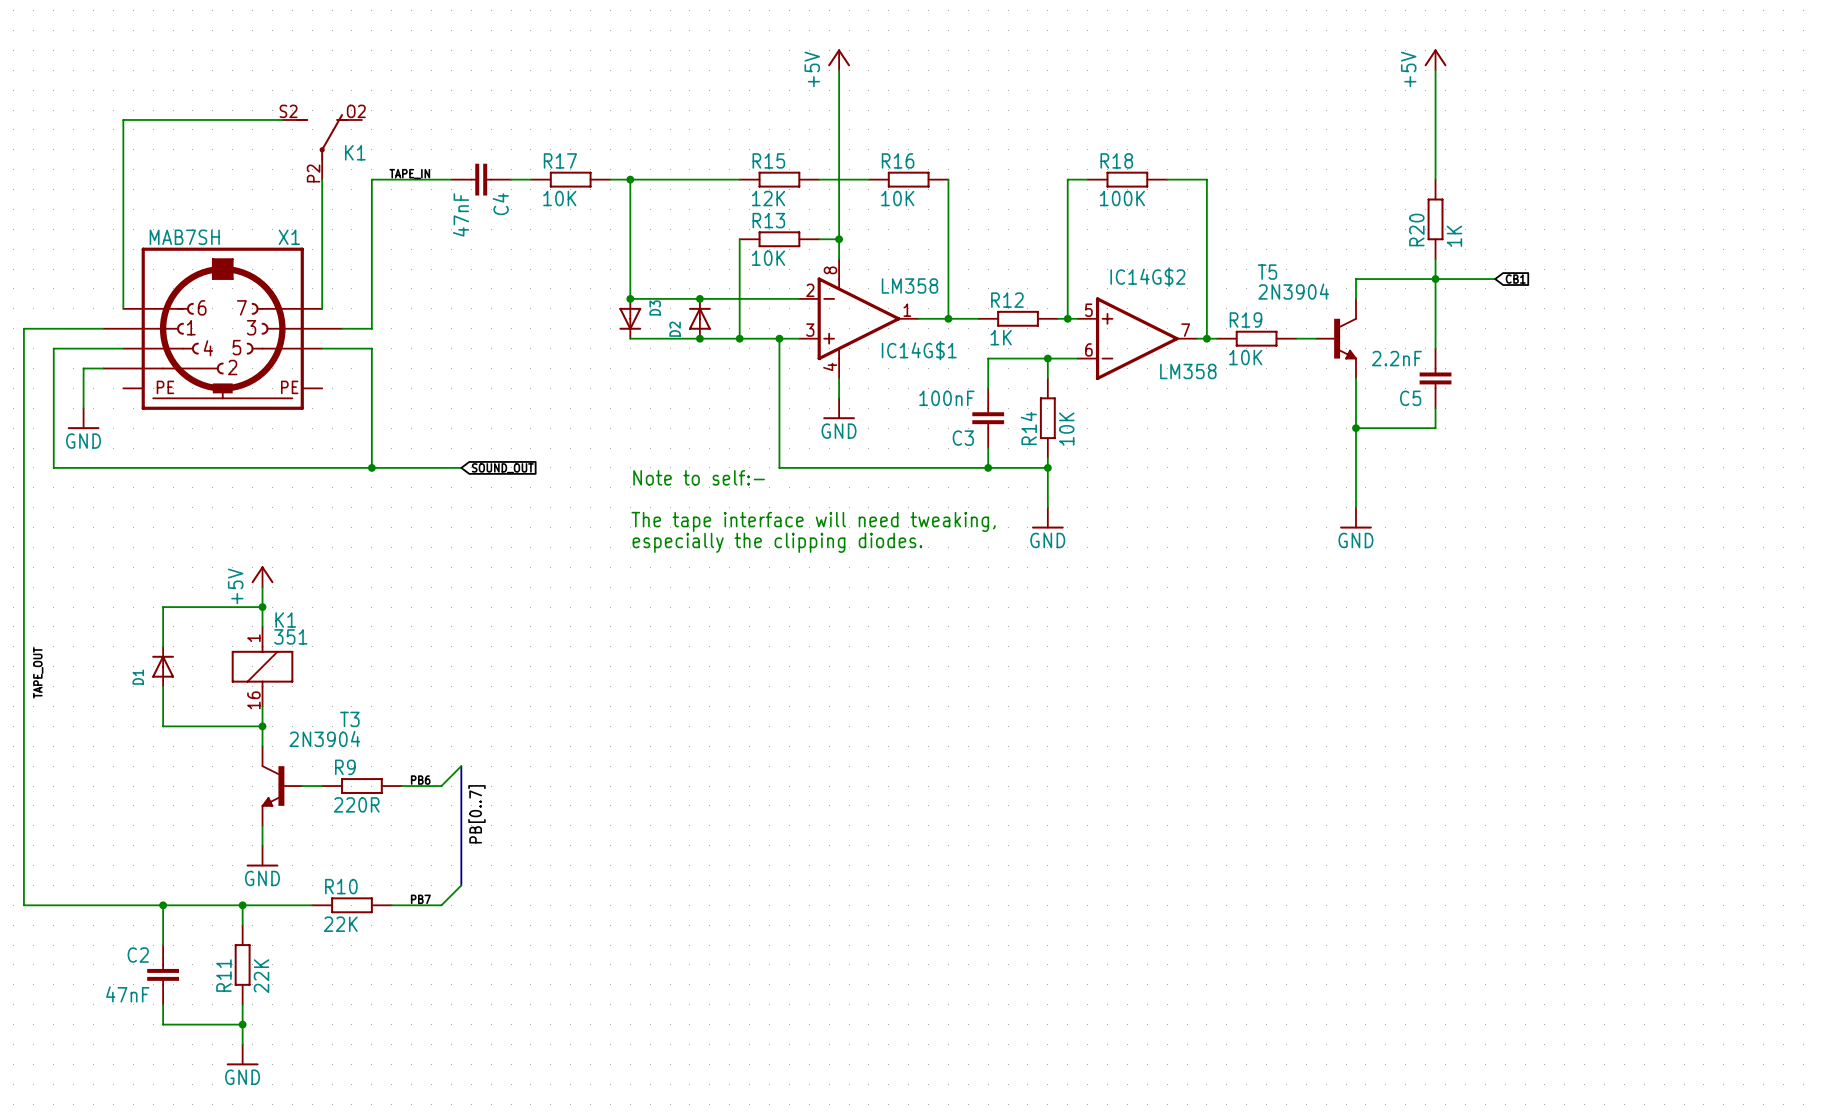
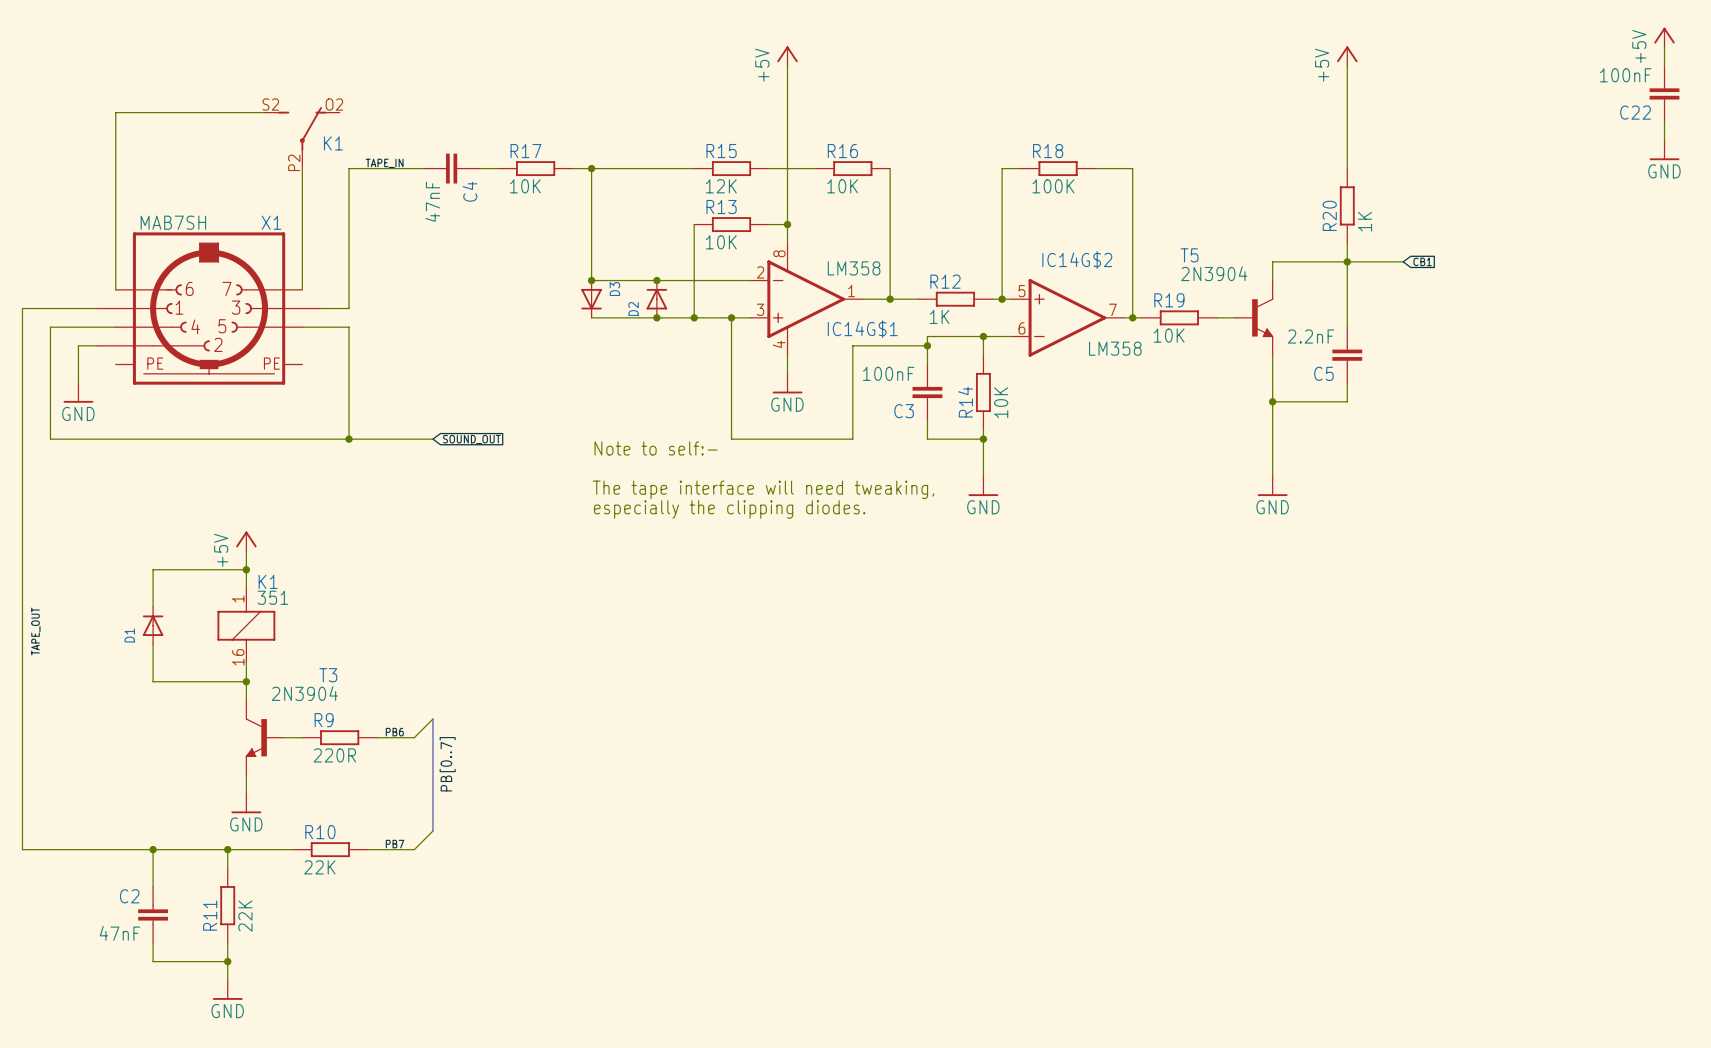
power symbol: none -> +5V (1664, 37)
wire: none -> (1664, 47) (1664, 65)
C22: none -> 100nF (1664, 93)
wire: none -> (1664, 121) (1664, 140)
power symbol: none -> GND (1664, 150)
junction: none -> (927, 345)
wire: (908, 467) (988, 467) -> (852, 439) (852, 345) (927, 345)
junction: (988, 467) -> none

